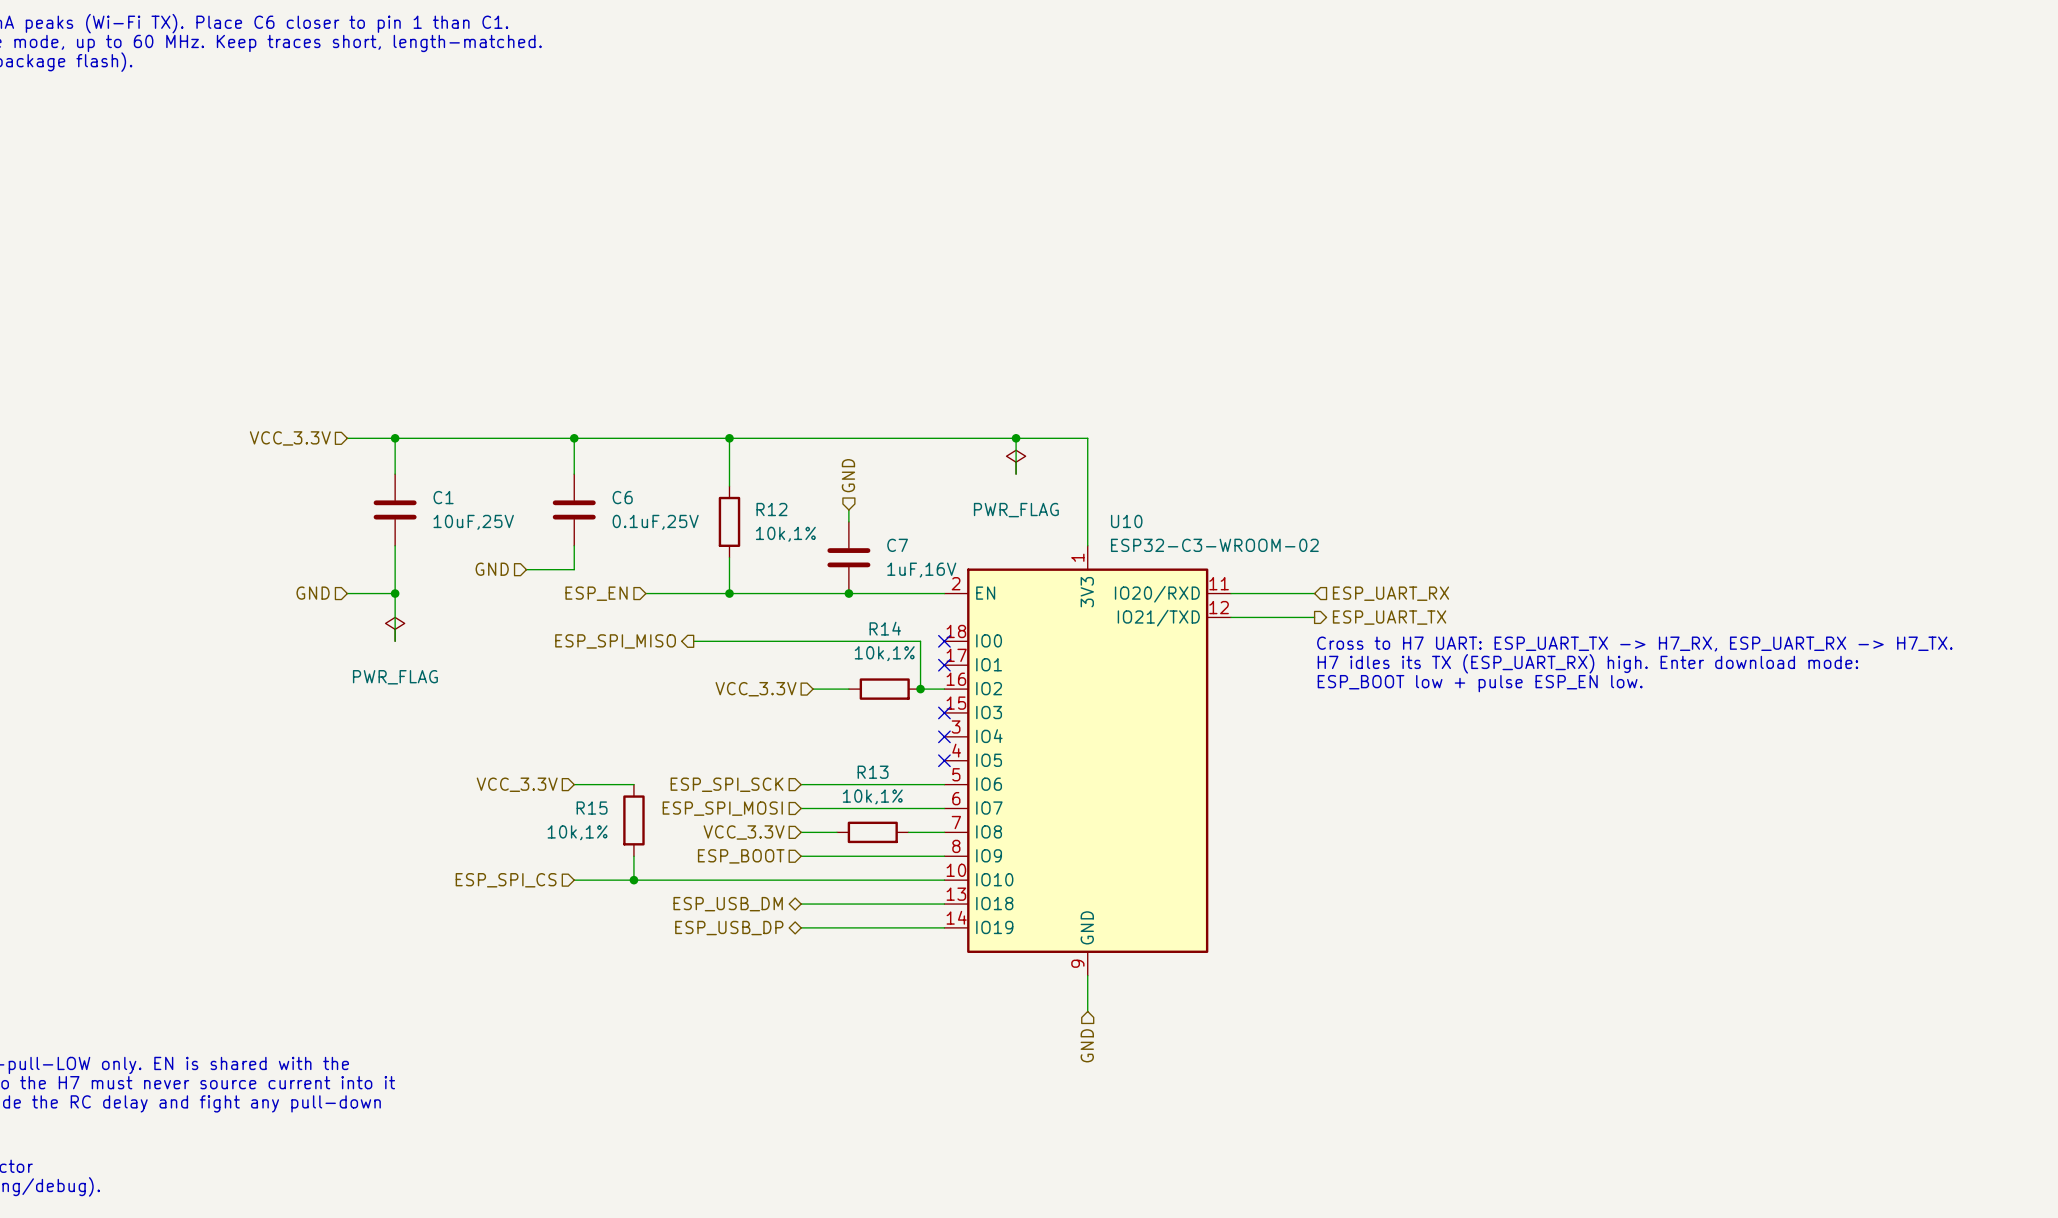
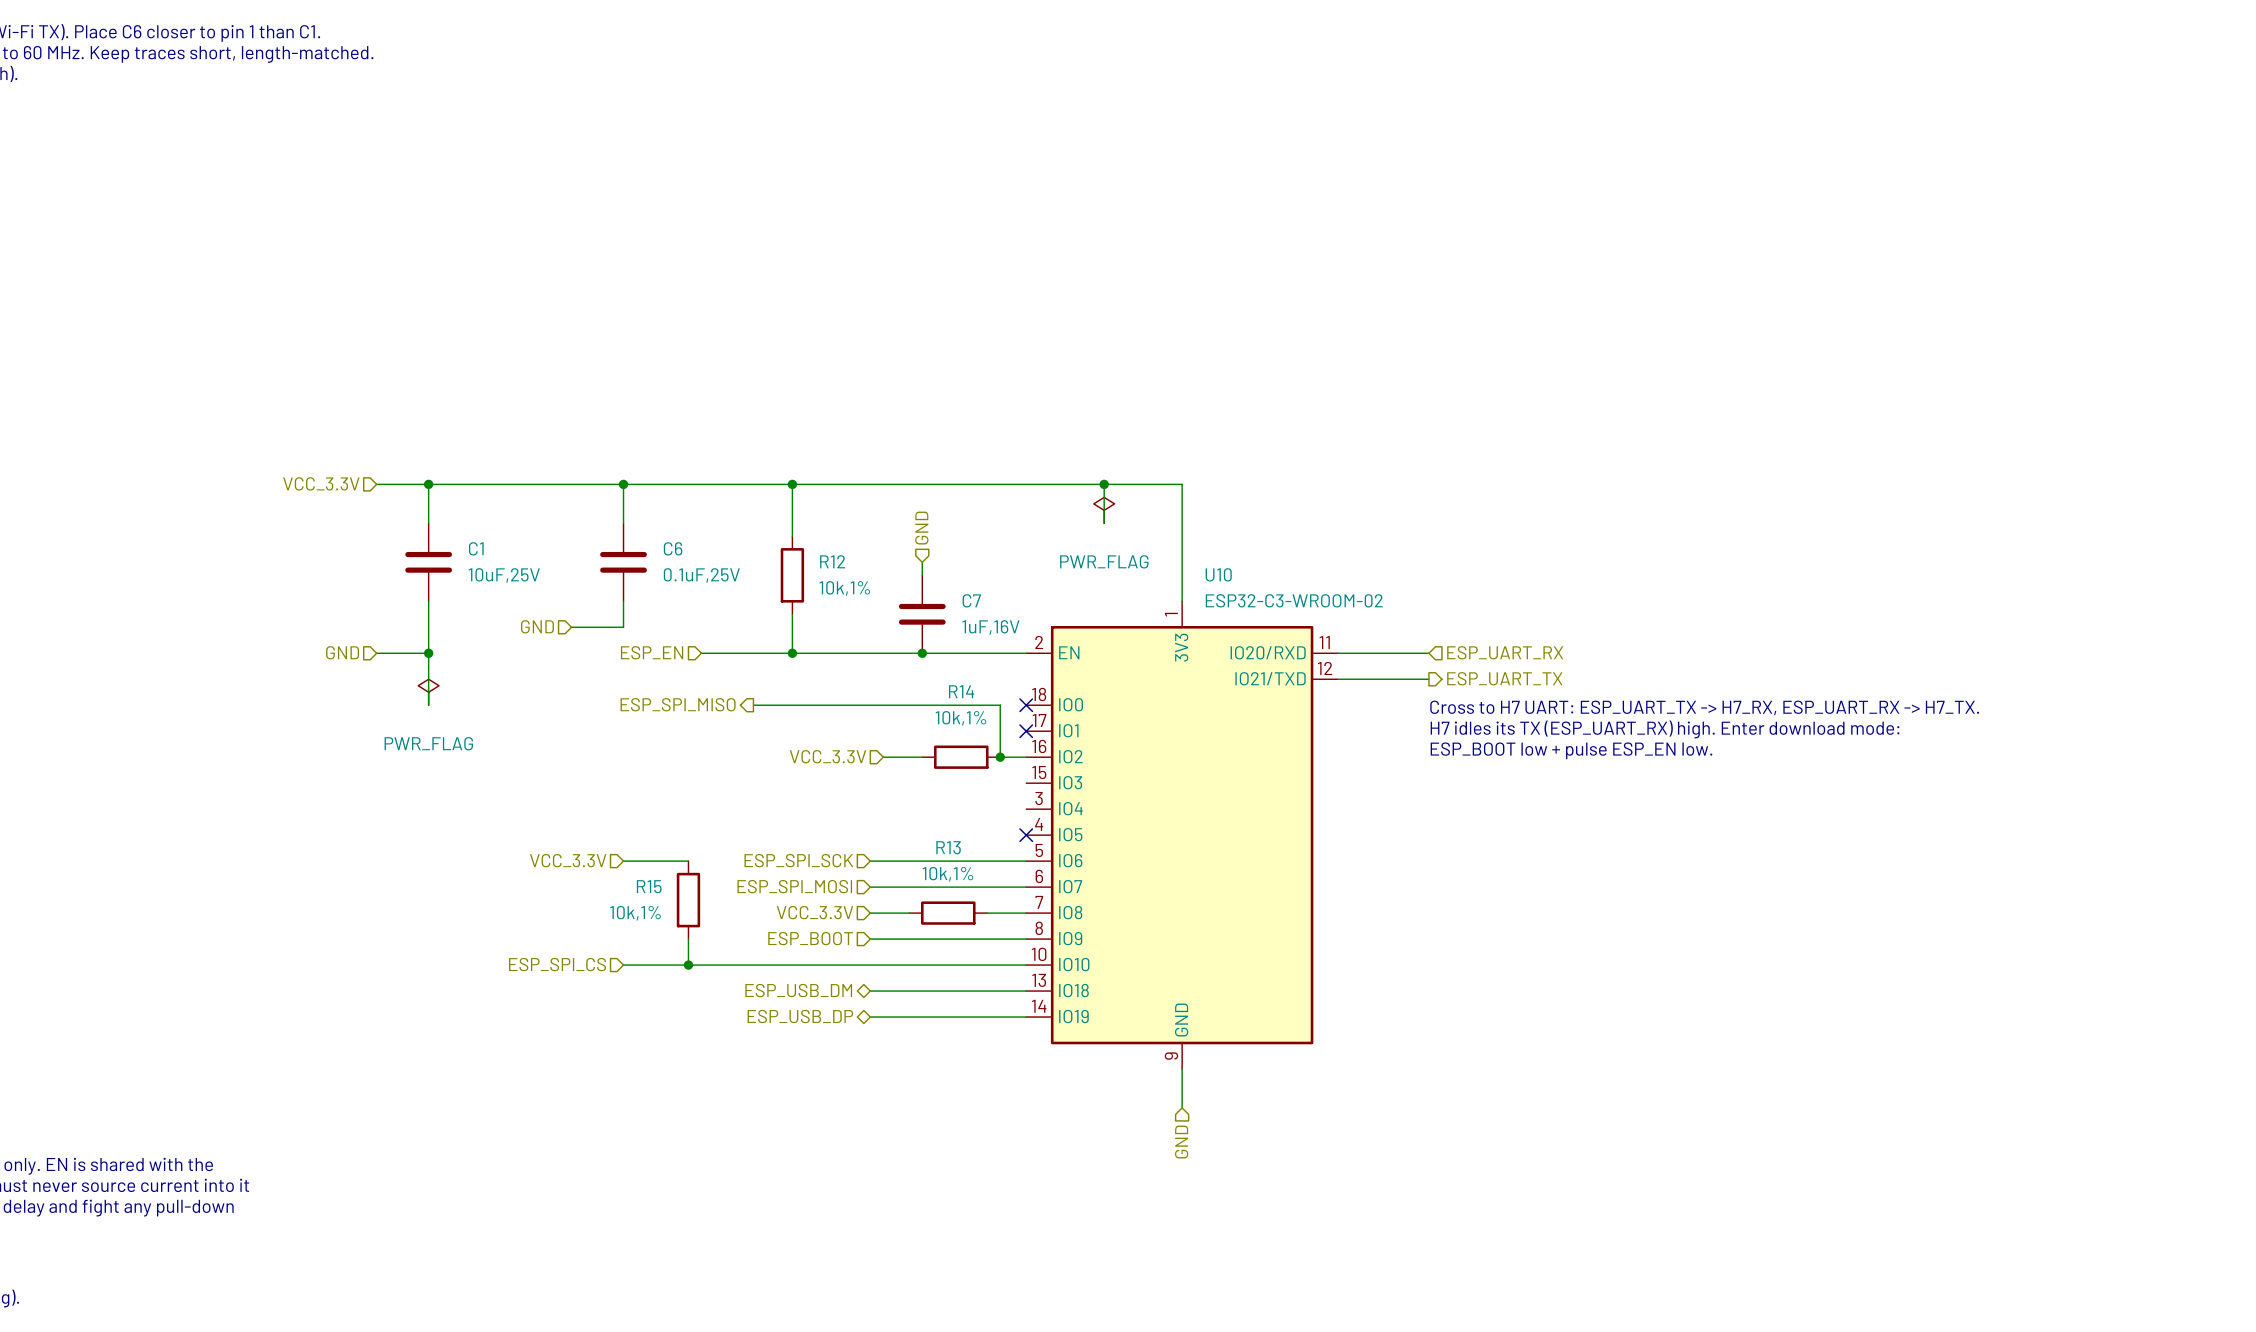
no-connect mark: (944, 712) -> none
no-connect mark: (944, 736) -> none

